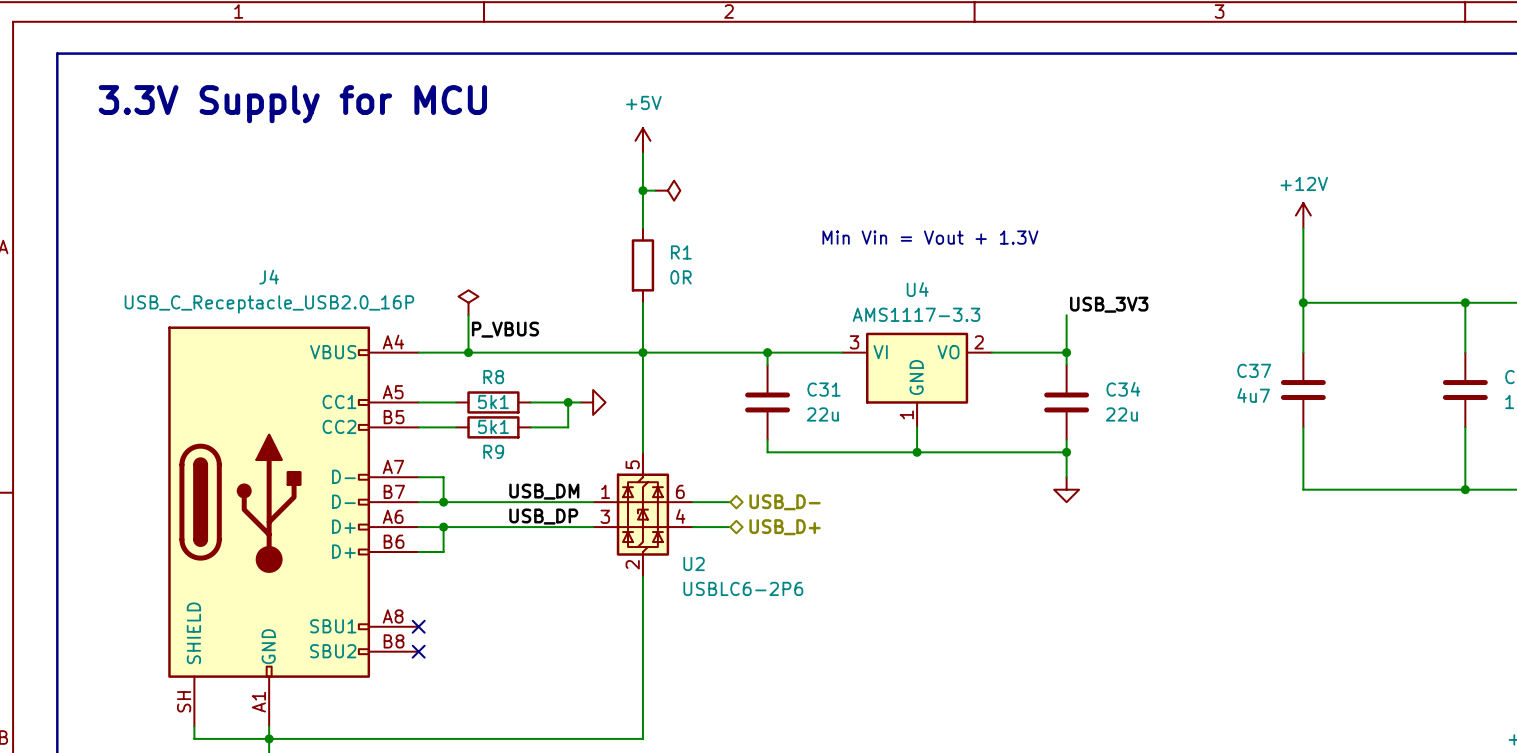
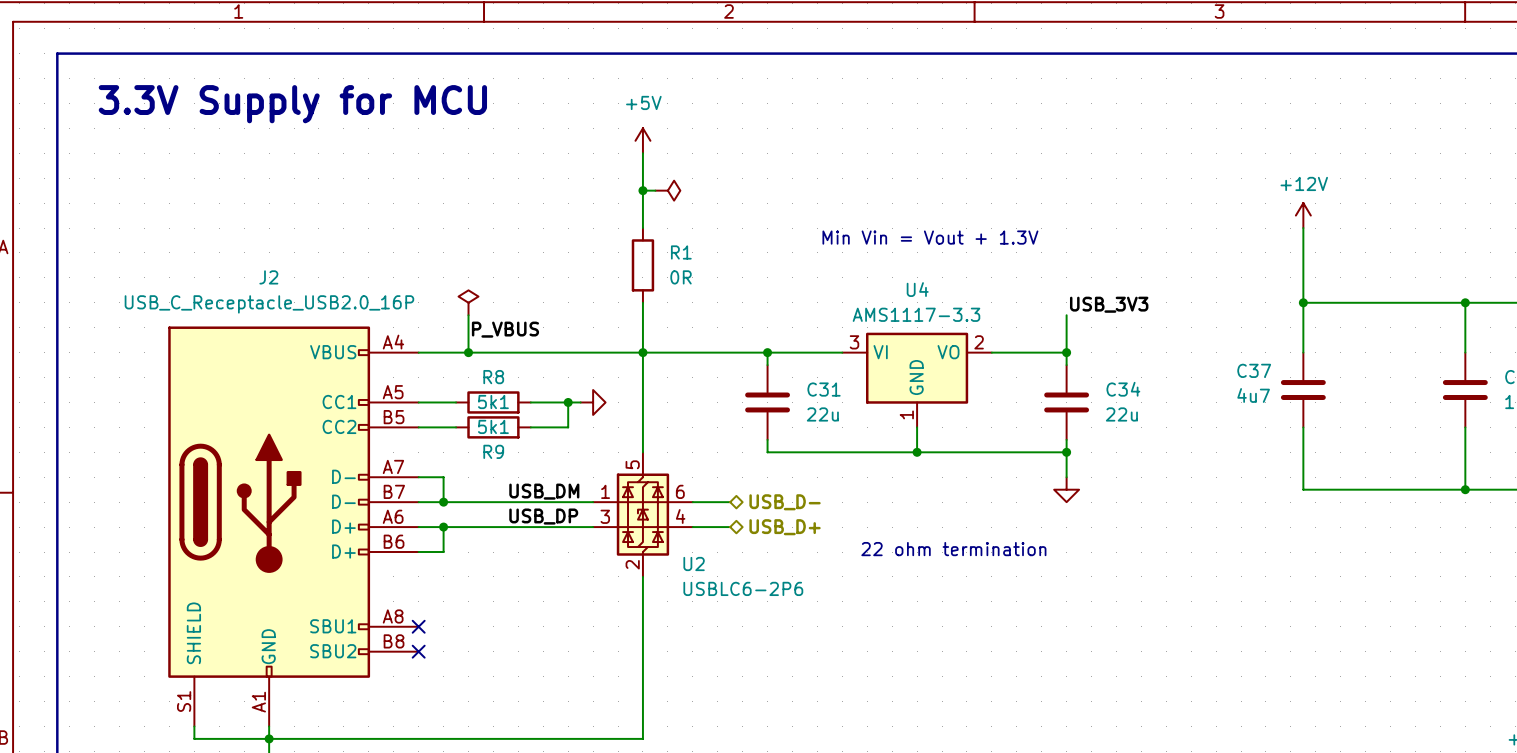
J4 name: J4 (269, 277) -> J2 (268, 277)
text: none -> 22 ohm termination (953, 549)
J4 pin number: SH (184, 701) -> S1 (184, 701)

